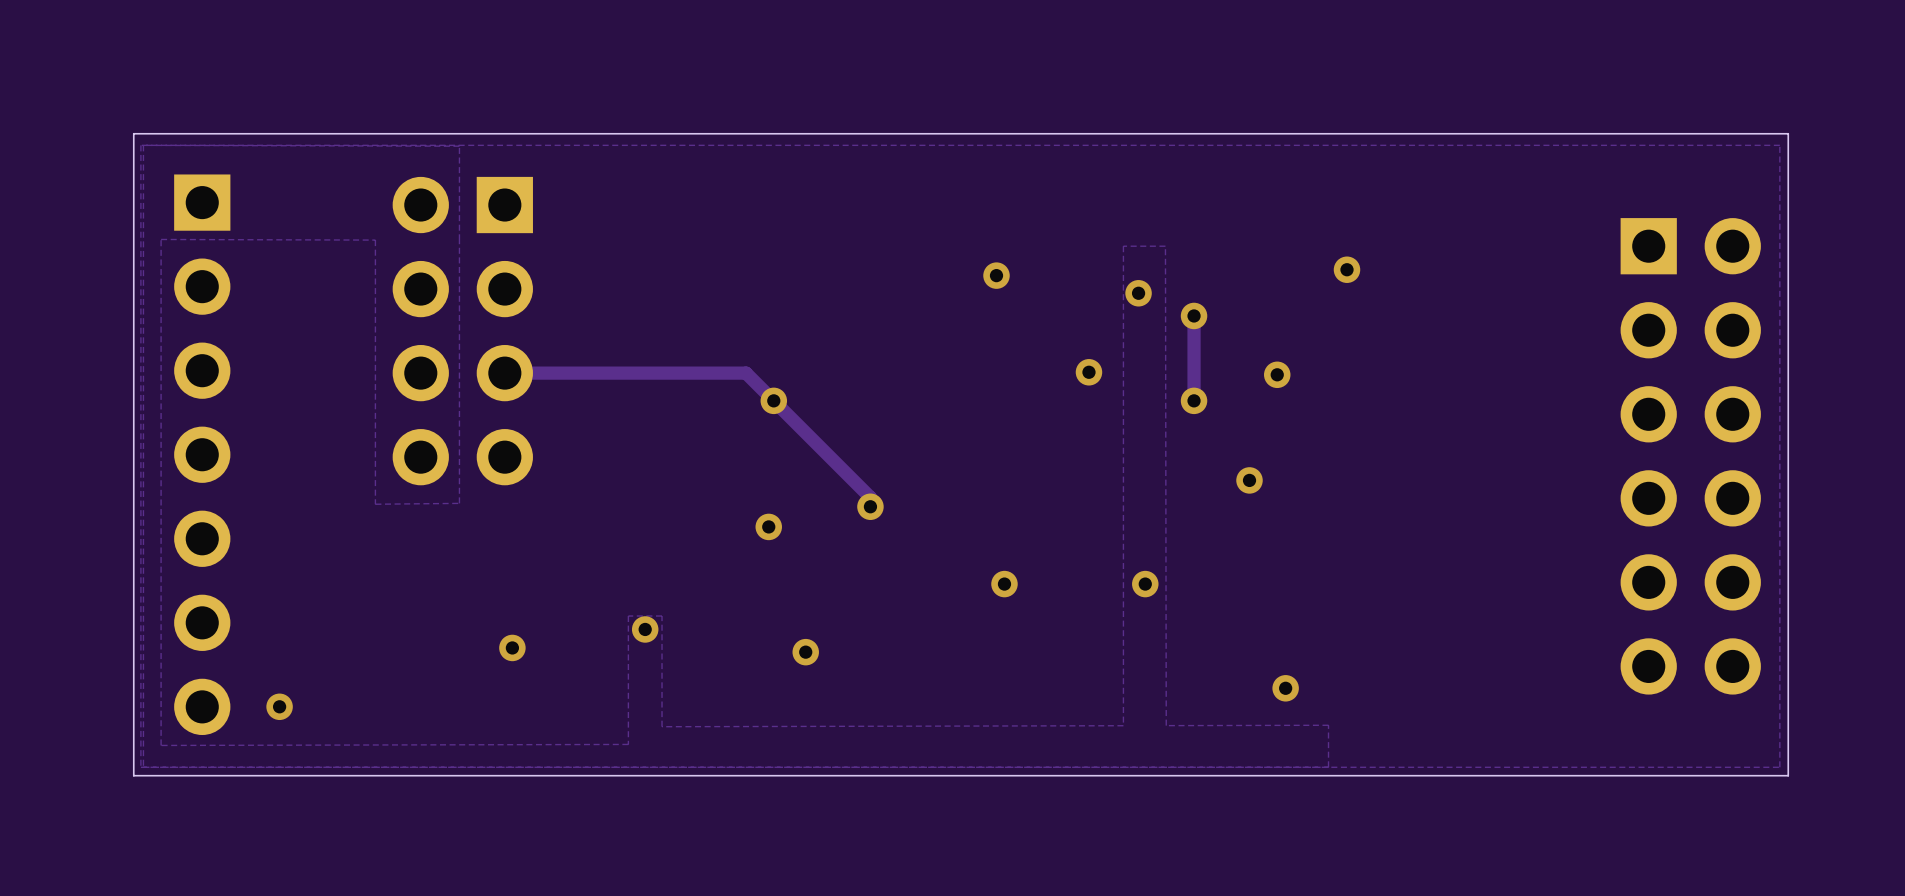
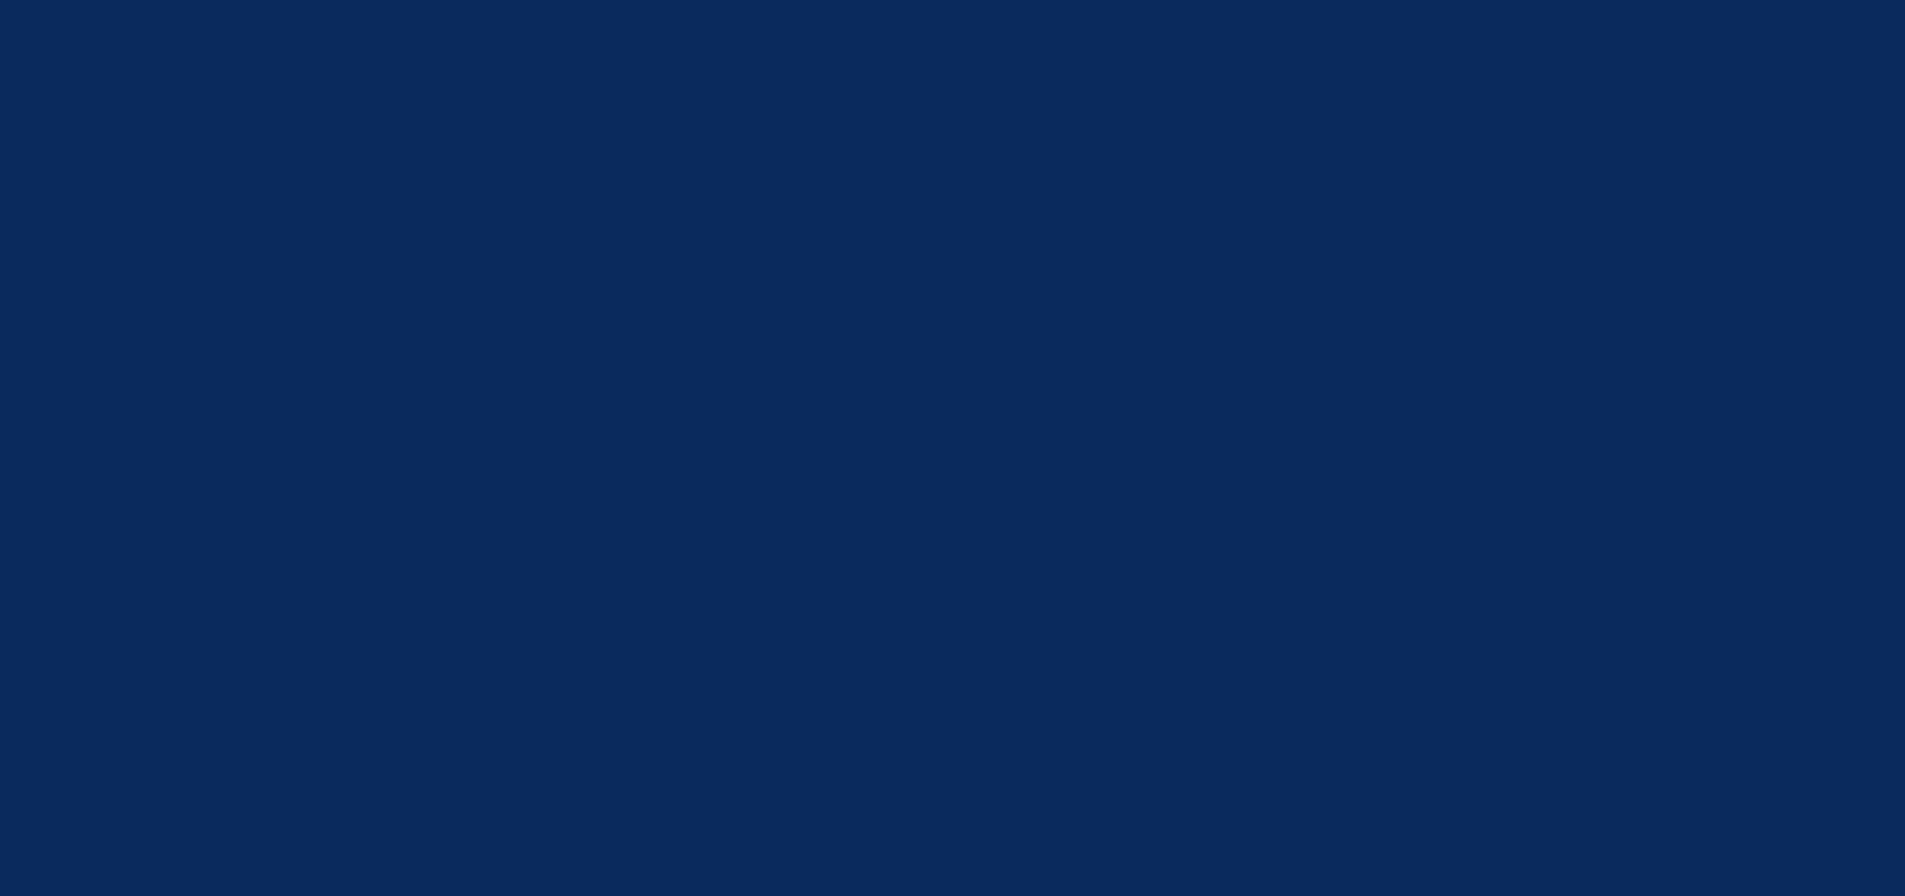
board edge: (1788, 133) (133, 133) (133, 775) (1788, 775) (1788, 133) -> none
zone outline: (1779, 145) (1779, 767) (140, 767) (140, 145) (1779, 145) -> none
via: (1347, 269) -> none
via: (996, 275) -> none
via: (1138, 293) -> none
track: (1194, 315) (1194, 400) -> none
via: (1194, 315) -> none
part: (462, 331) -> none
via: (1088, 372) -> none
track: (504, 373) (746, 373) (870, 497) (870, 506) -> none
via: (1277, 374) -> none
via: (773, 400) -> none
via: (1194, 400) -> none
part: (202, 454) -> none
part: (1690, 456) -> none
via: (1249, 480) -> none
via: (870, 506) -> none
via: (768, 526) -> none
via: (1004, 584) -> none
via: (1145, 584) -> none
via: (645, 629) -> none
via: (512, 647) -> none
via: (805, 652) -> none
via: (1285, 688) -> none
via: (279, 706) -> none
zone outline: (1328, 767) (1328, 725) (1166, 725) (1165, 246) (1123, 246) (1123, 725) (662, 726) (662, 616) (628, 616) (628, 744) (161, 745) (161, 239) (375, 240) (375, 504) (459, 503) (459, 146) (143, 145) (143, 767) -> none

